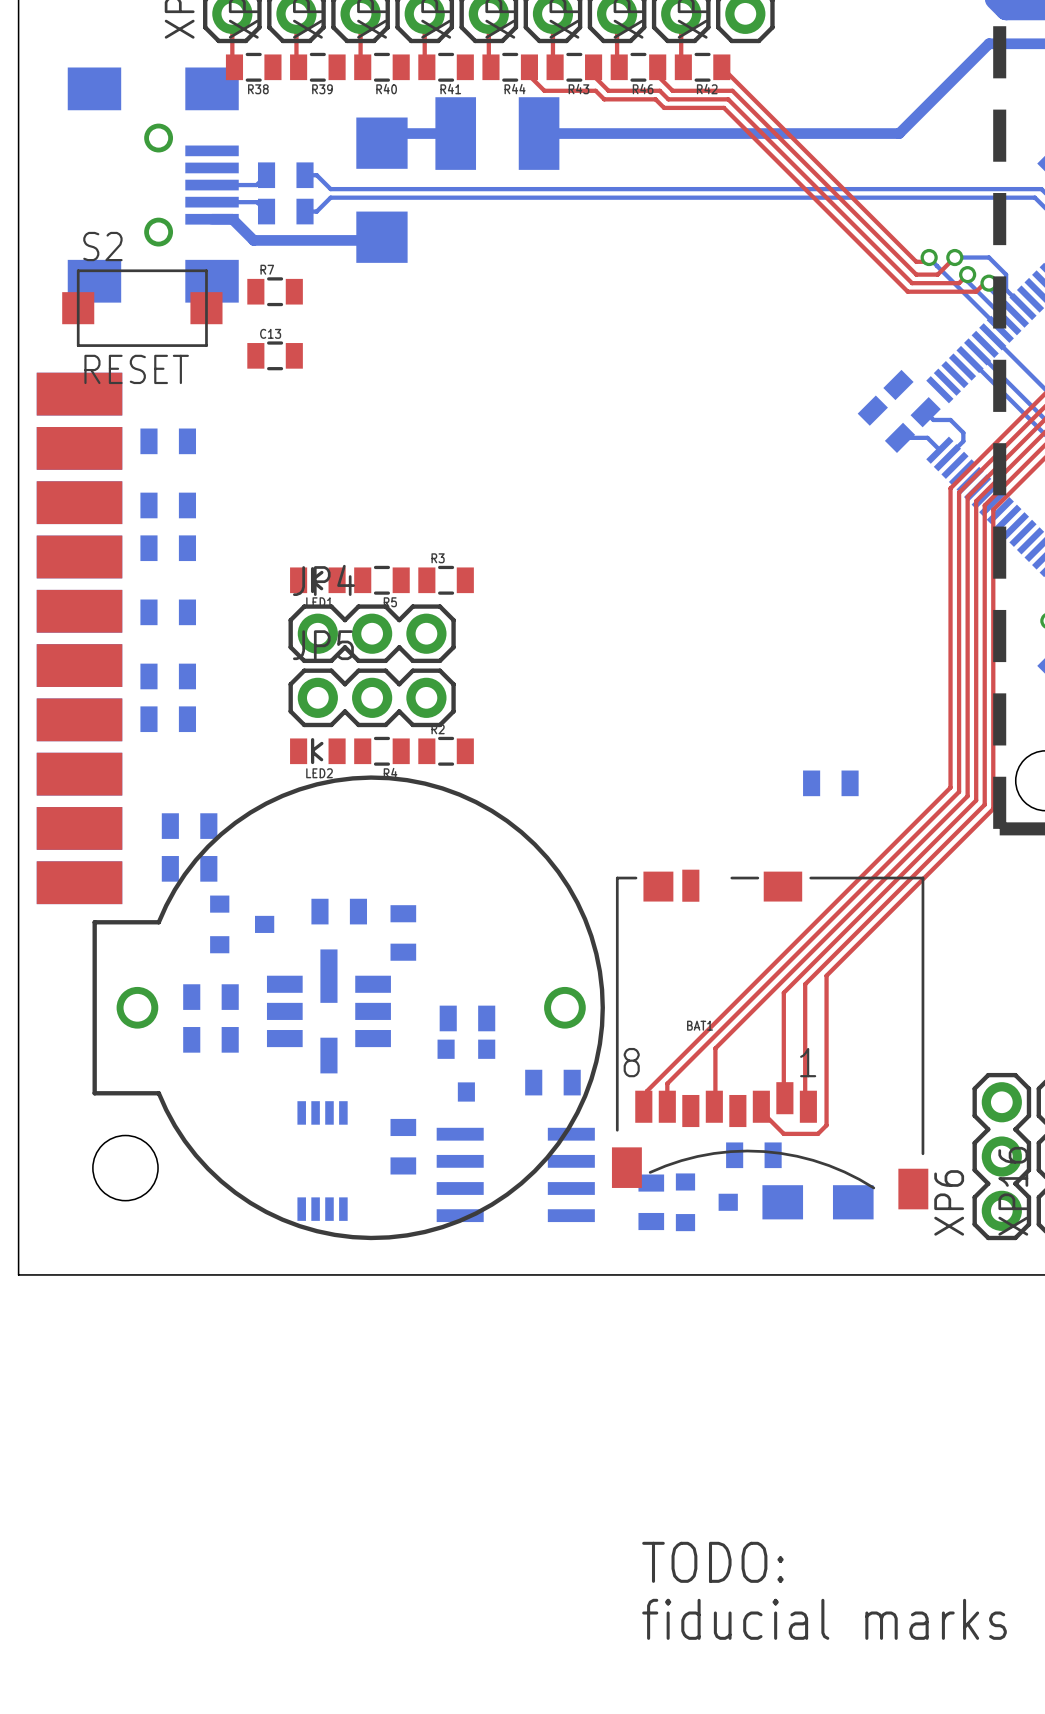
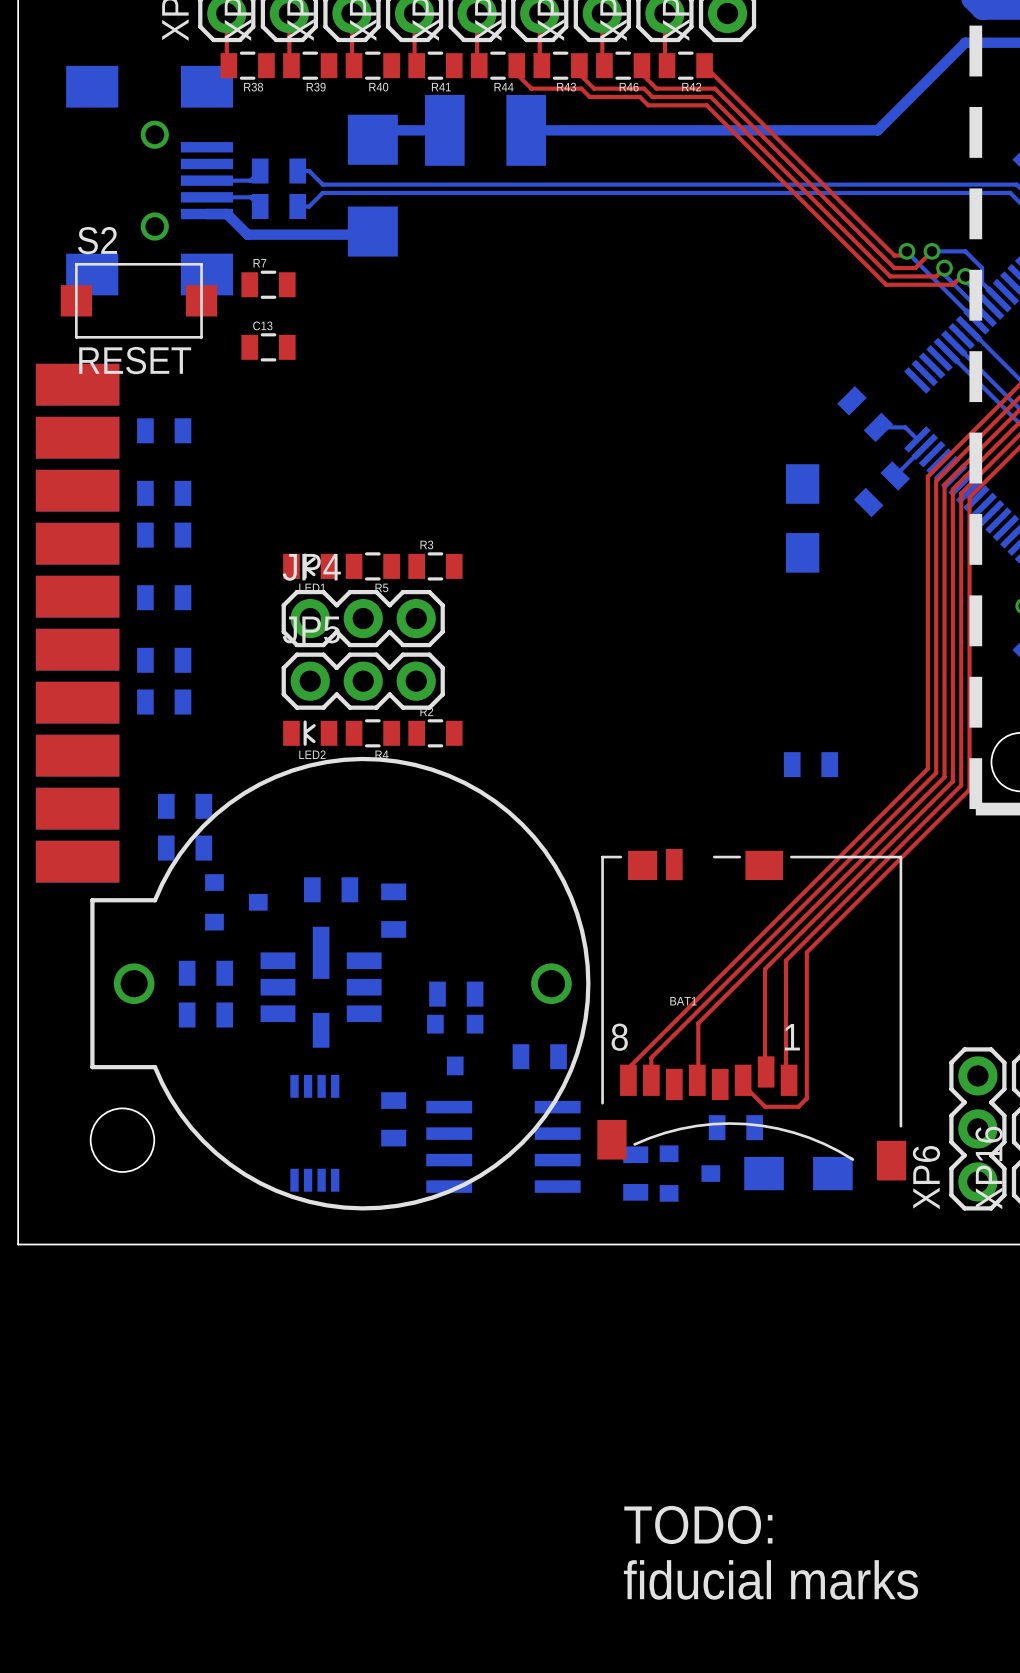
part rotation: 0° (912, 398) -> 90° clockwise (881, 489)
part position: (912, 398) -> (881, 489)
bottom track: (925, 412) (933, 419) (950, 419) (963, 432) (963, 441) (947, 457) -> (895, 475) (924, 446)
part: none -> (802, 518)

